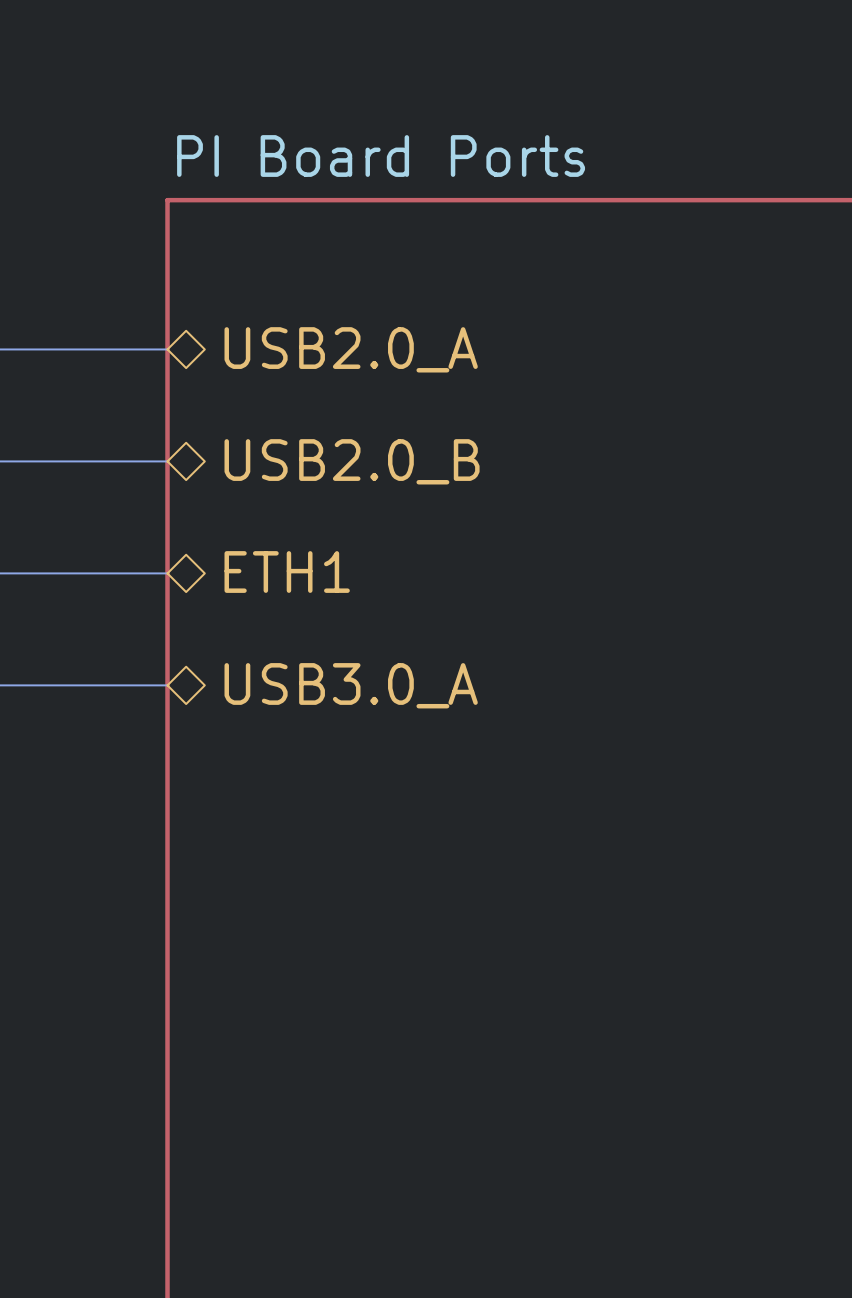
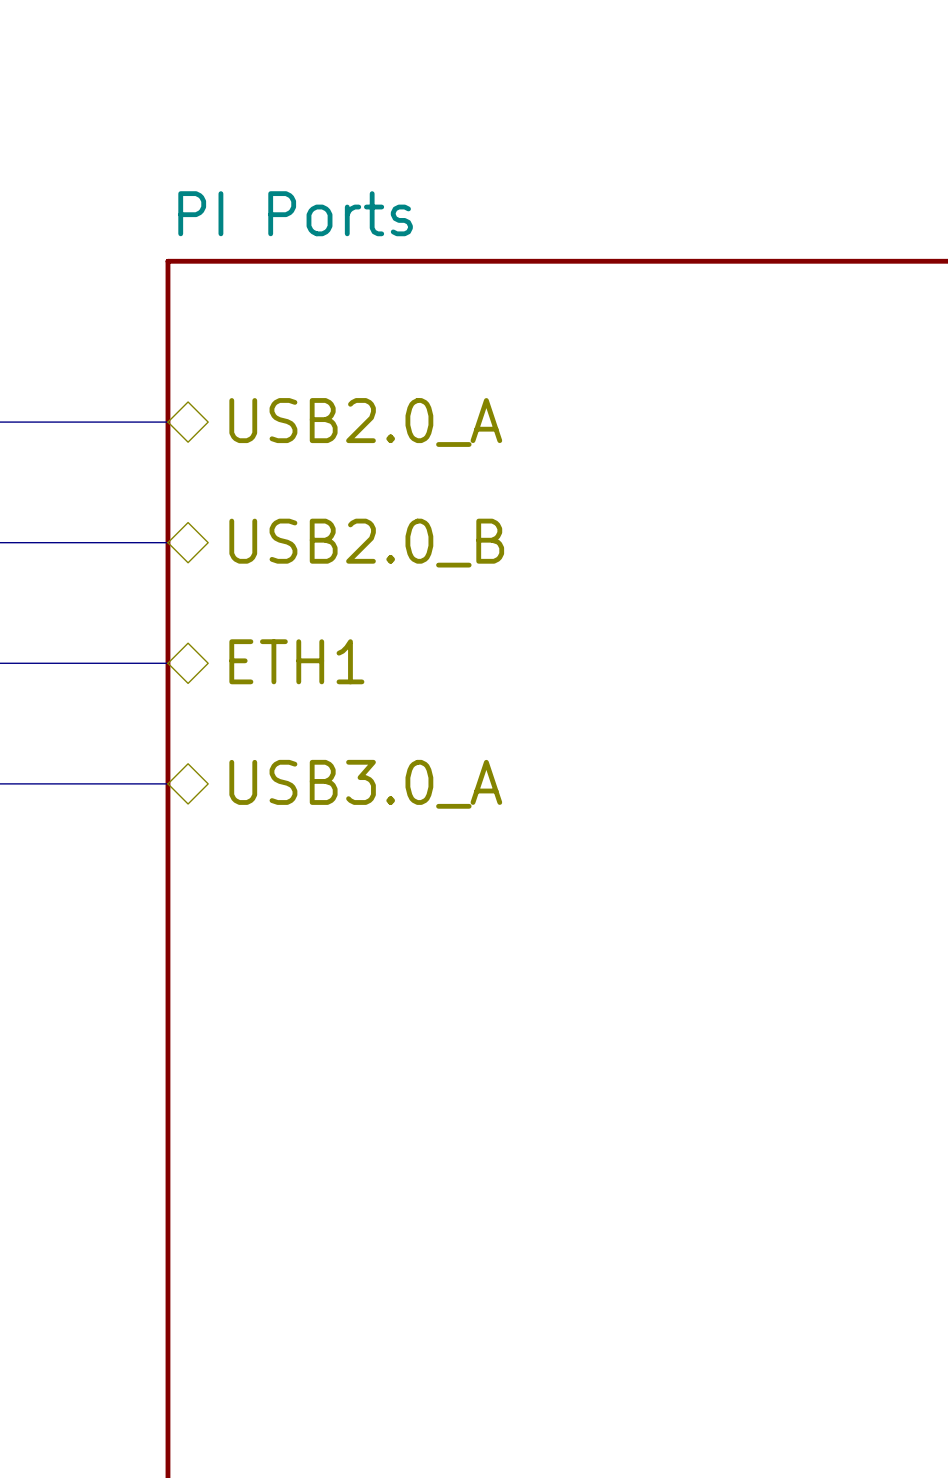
sheet PI Board Ports name: PI Board Ports (381, 156) -> PI Ports (295, 213)

